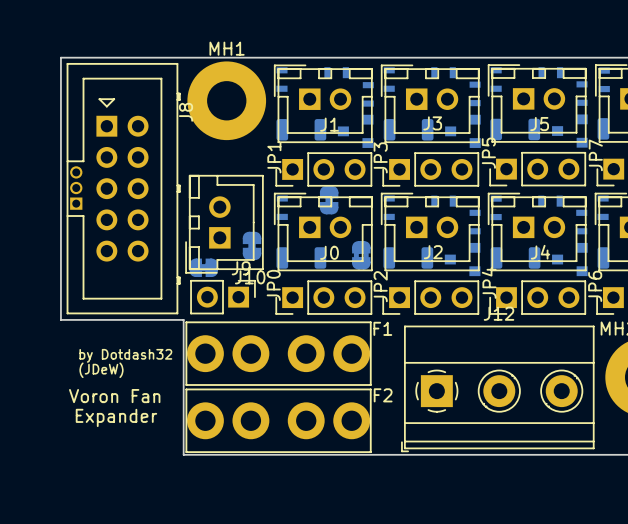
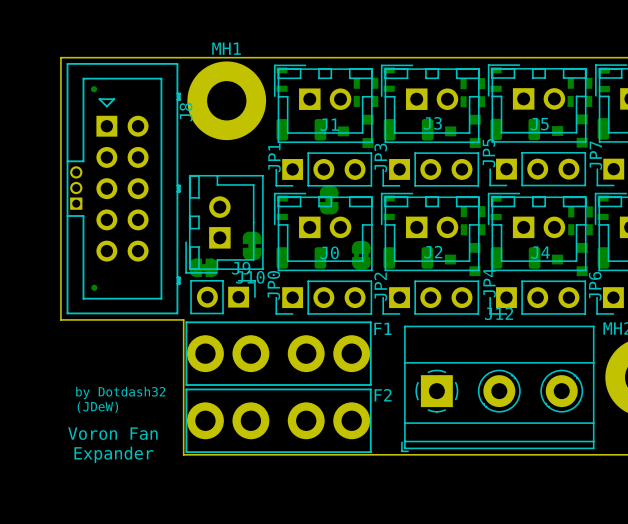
part: (336, 72) -> none
part: (443, 72) -> none
part: (550, 72) -> none
part: none -> (365, 83)
part: none -> (472, 83)
part: none -> (580, 83)
part: none -> (94, 89)
part: (475, 93) -> none
part: (582, 93) -> none
part: (368, 94) -> none
part: none -> (365, 101)
part: none -> (472, 101)
part: none -> (579, 101)
part: (443, 201) -> none
part: (550, 201) -> none
part: none -> (473, 211)
part: none -> (580, 211)
part: (475, 222) -> none
part: (581, 222) -> none
part: none -> (473, 229)
part: none -> (580, 229)
part: none -> (94, 287)
text position: by Dotdash32 (125, 355) -> by Dotdash32 (120, 392)
text position: (JDeW) (101, 370) -> (JDeW) (97, 407)
text position: Voron Fan (114, 396) -> Voron Fan (112, 433)
text position: Expander (116, 417) -> Expander (113, 454)

